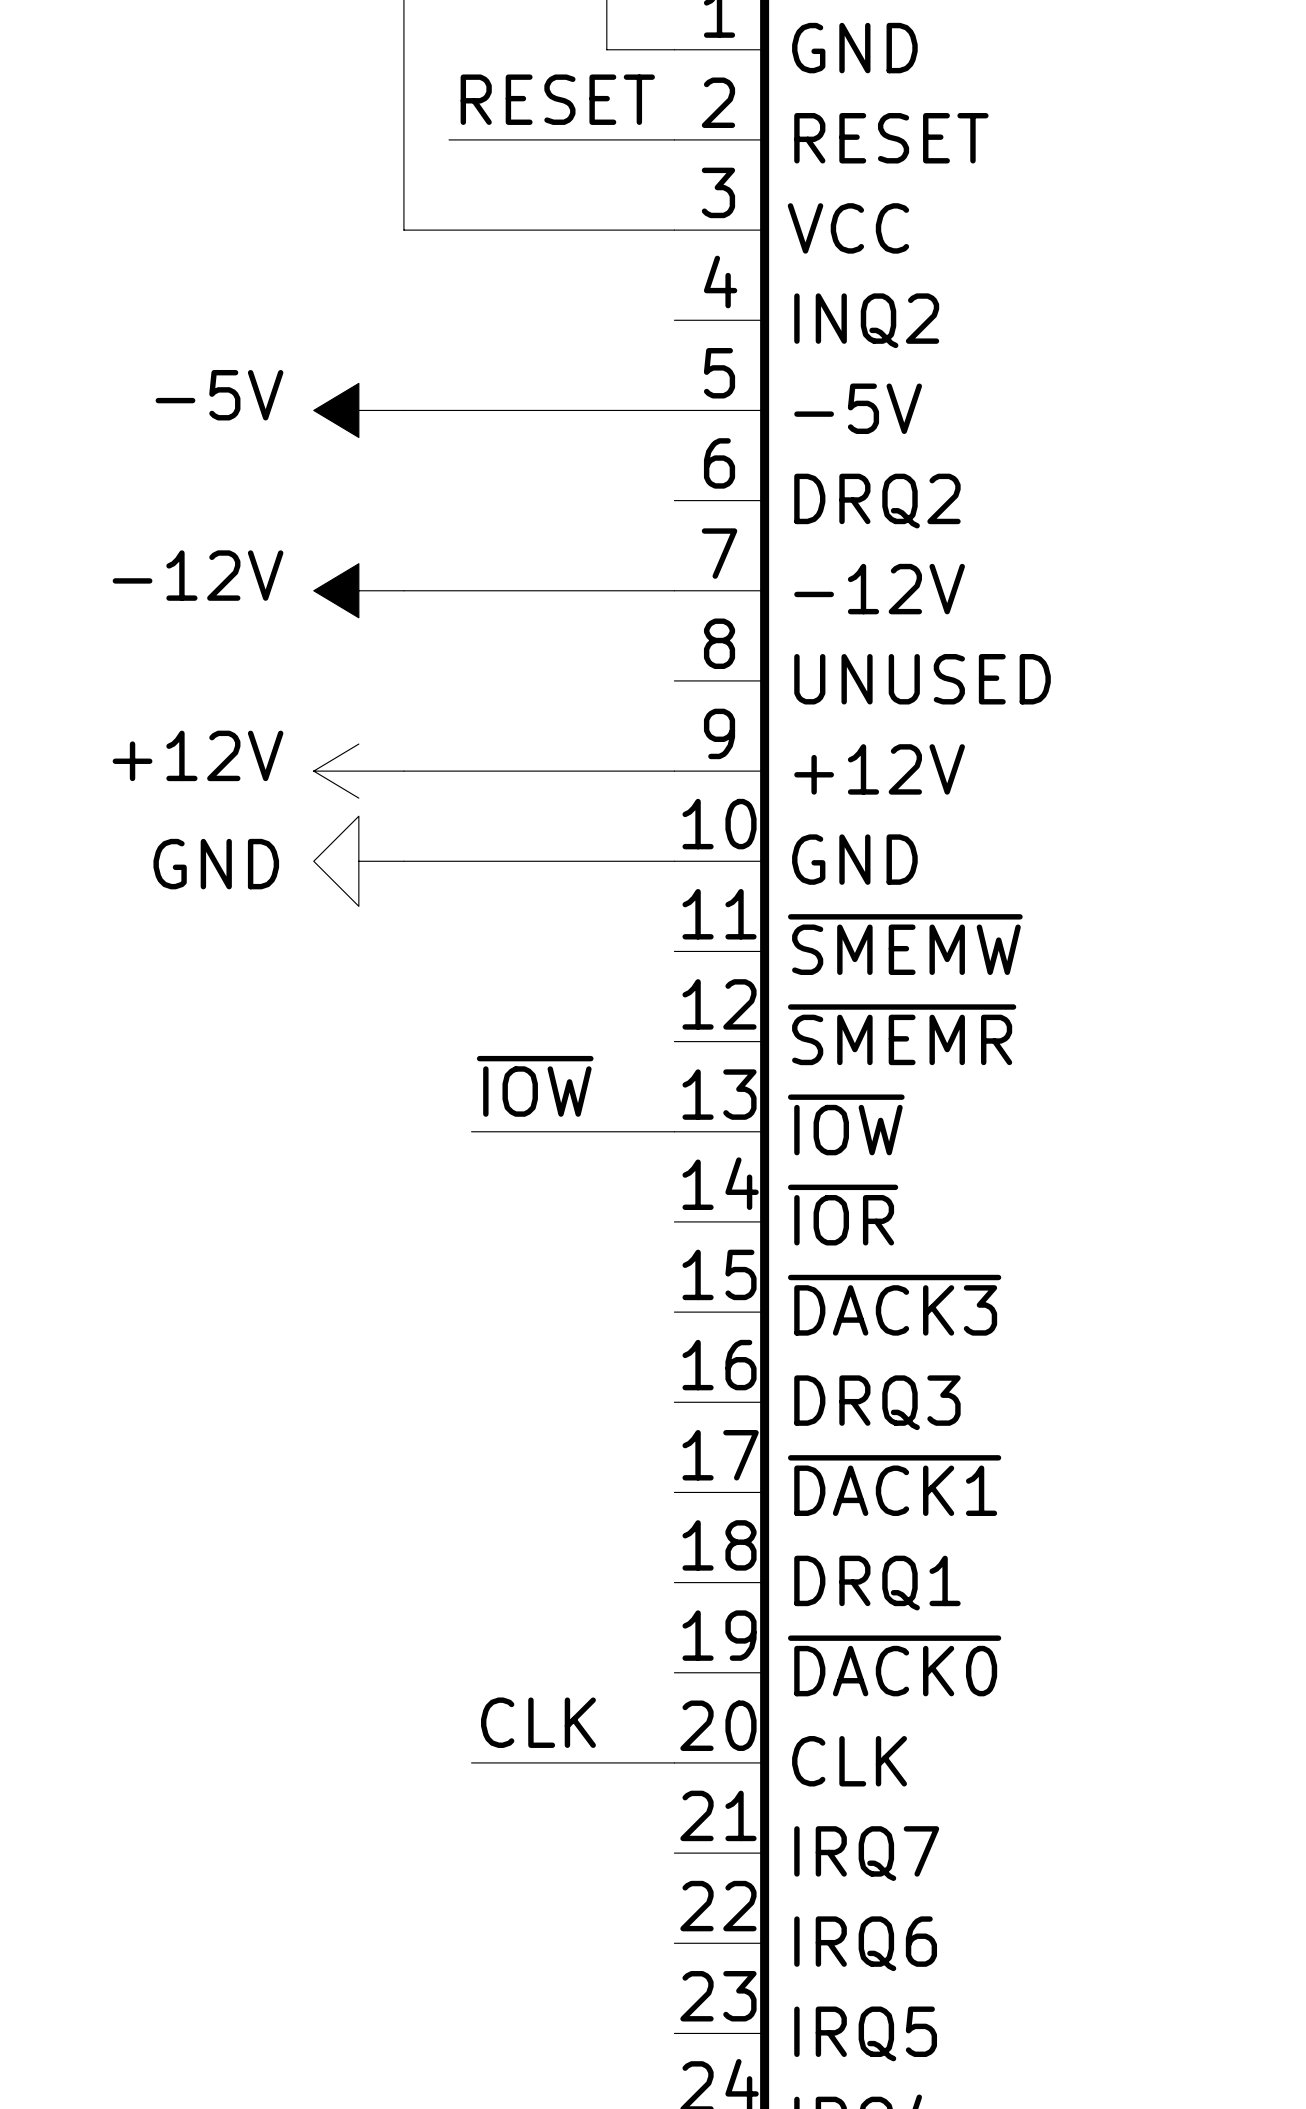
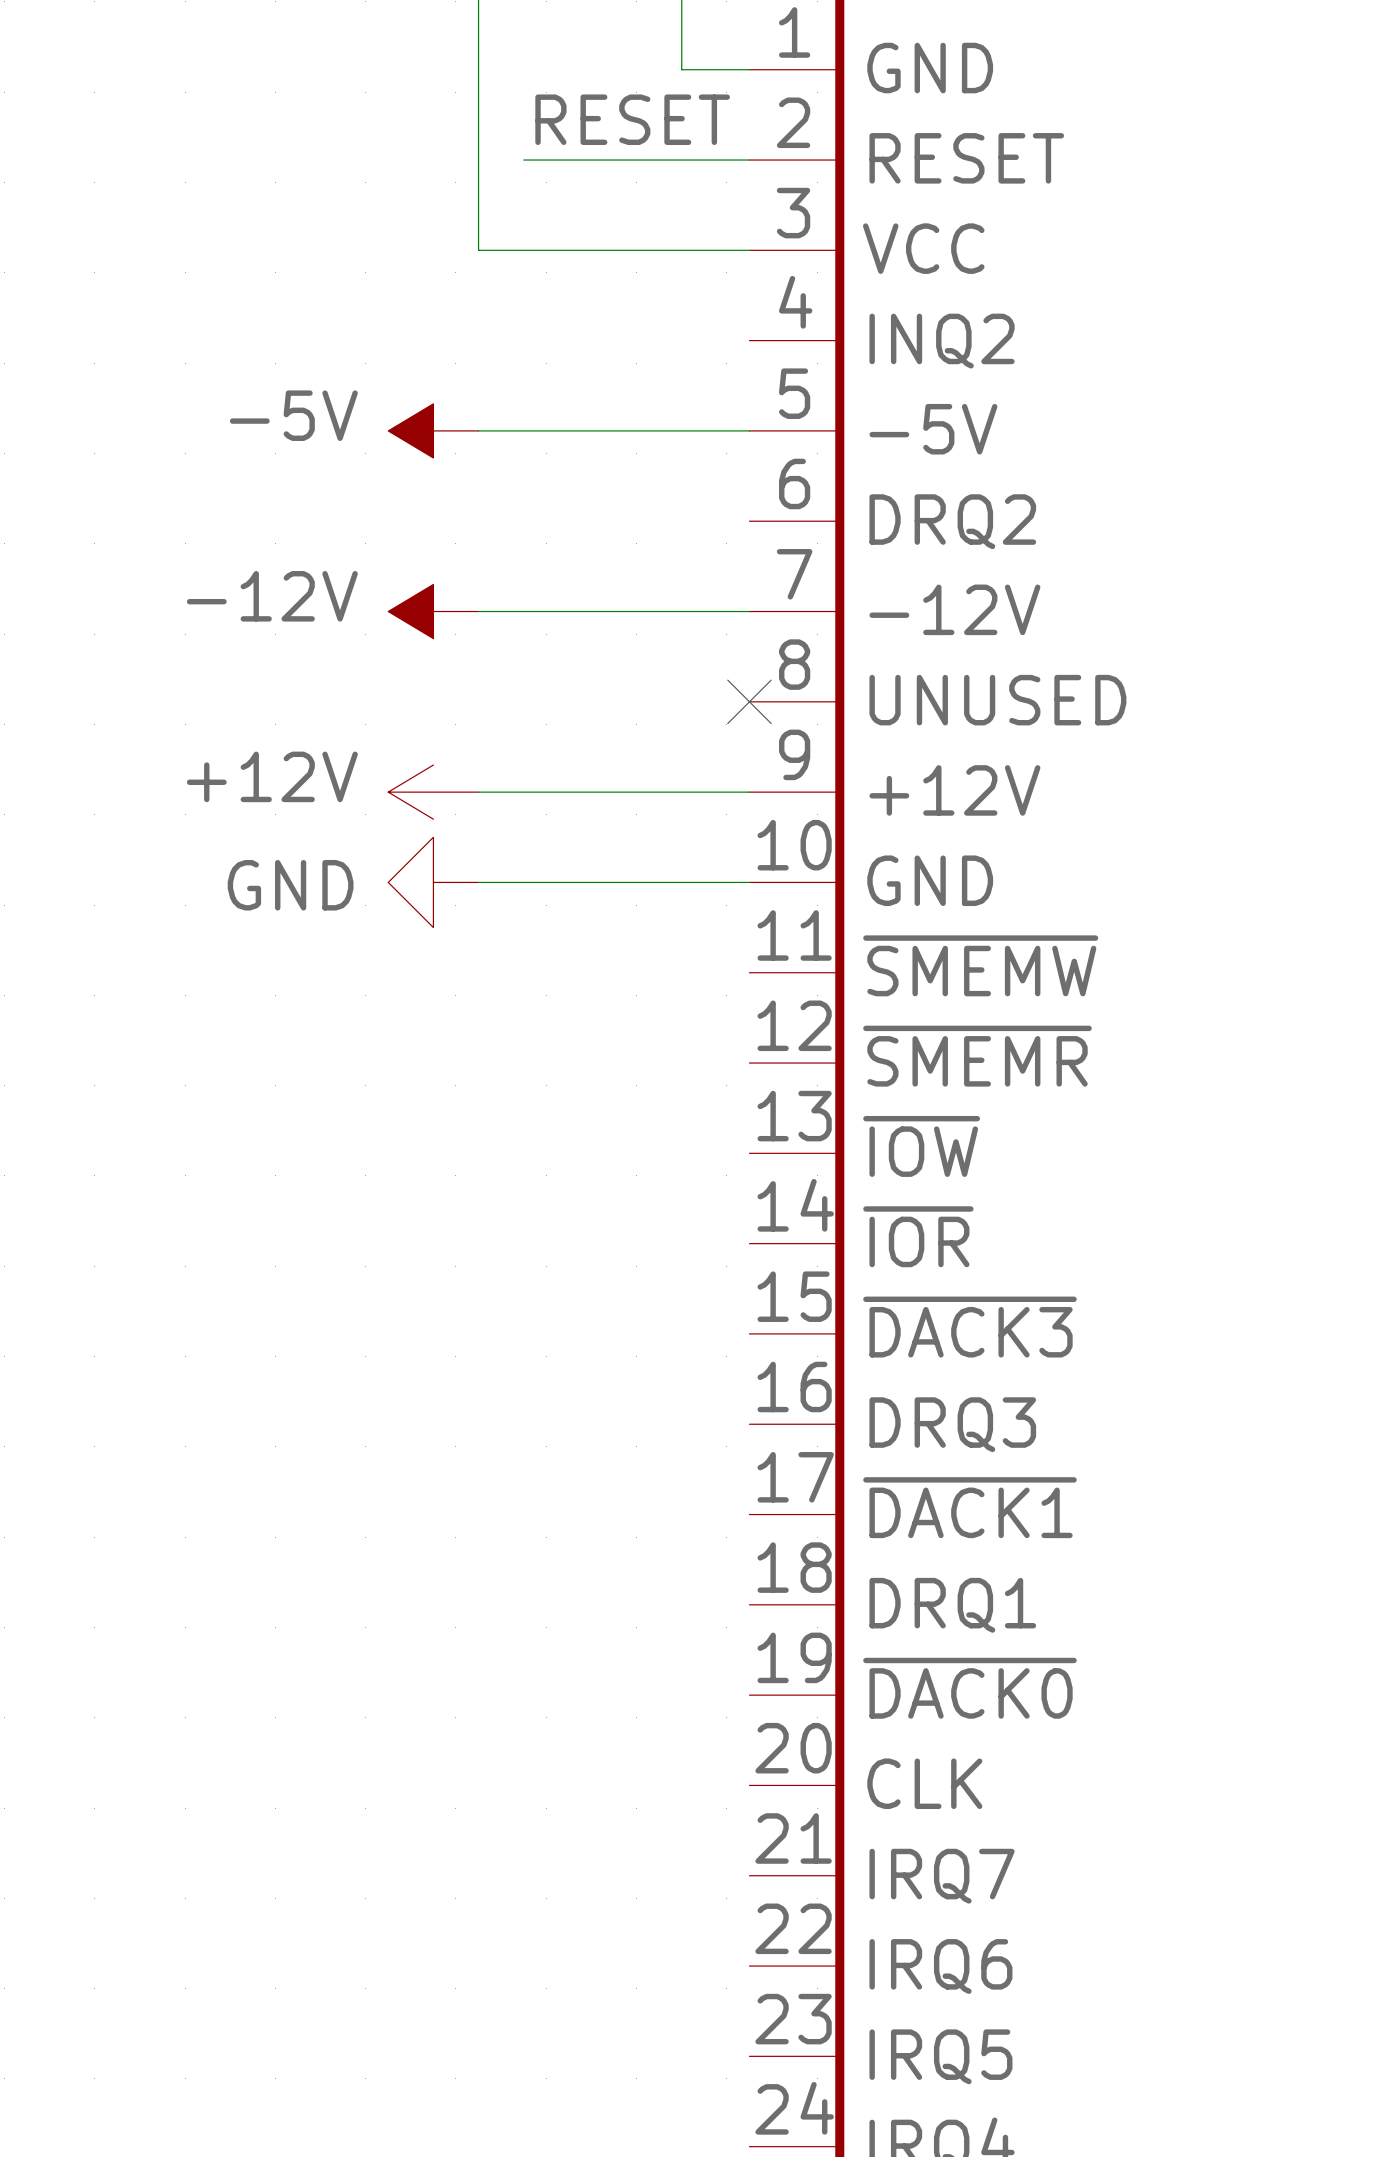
no-connect mark: none -> (749, 701)
label: ~{IOW} (535, 1086) -> none
wire: (471, 1131) (674, 1131) -> none
label: CLK (538, 1722) -> none
wire: (471, 1762) (674, 1762) -> none

